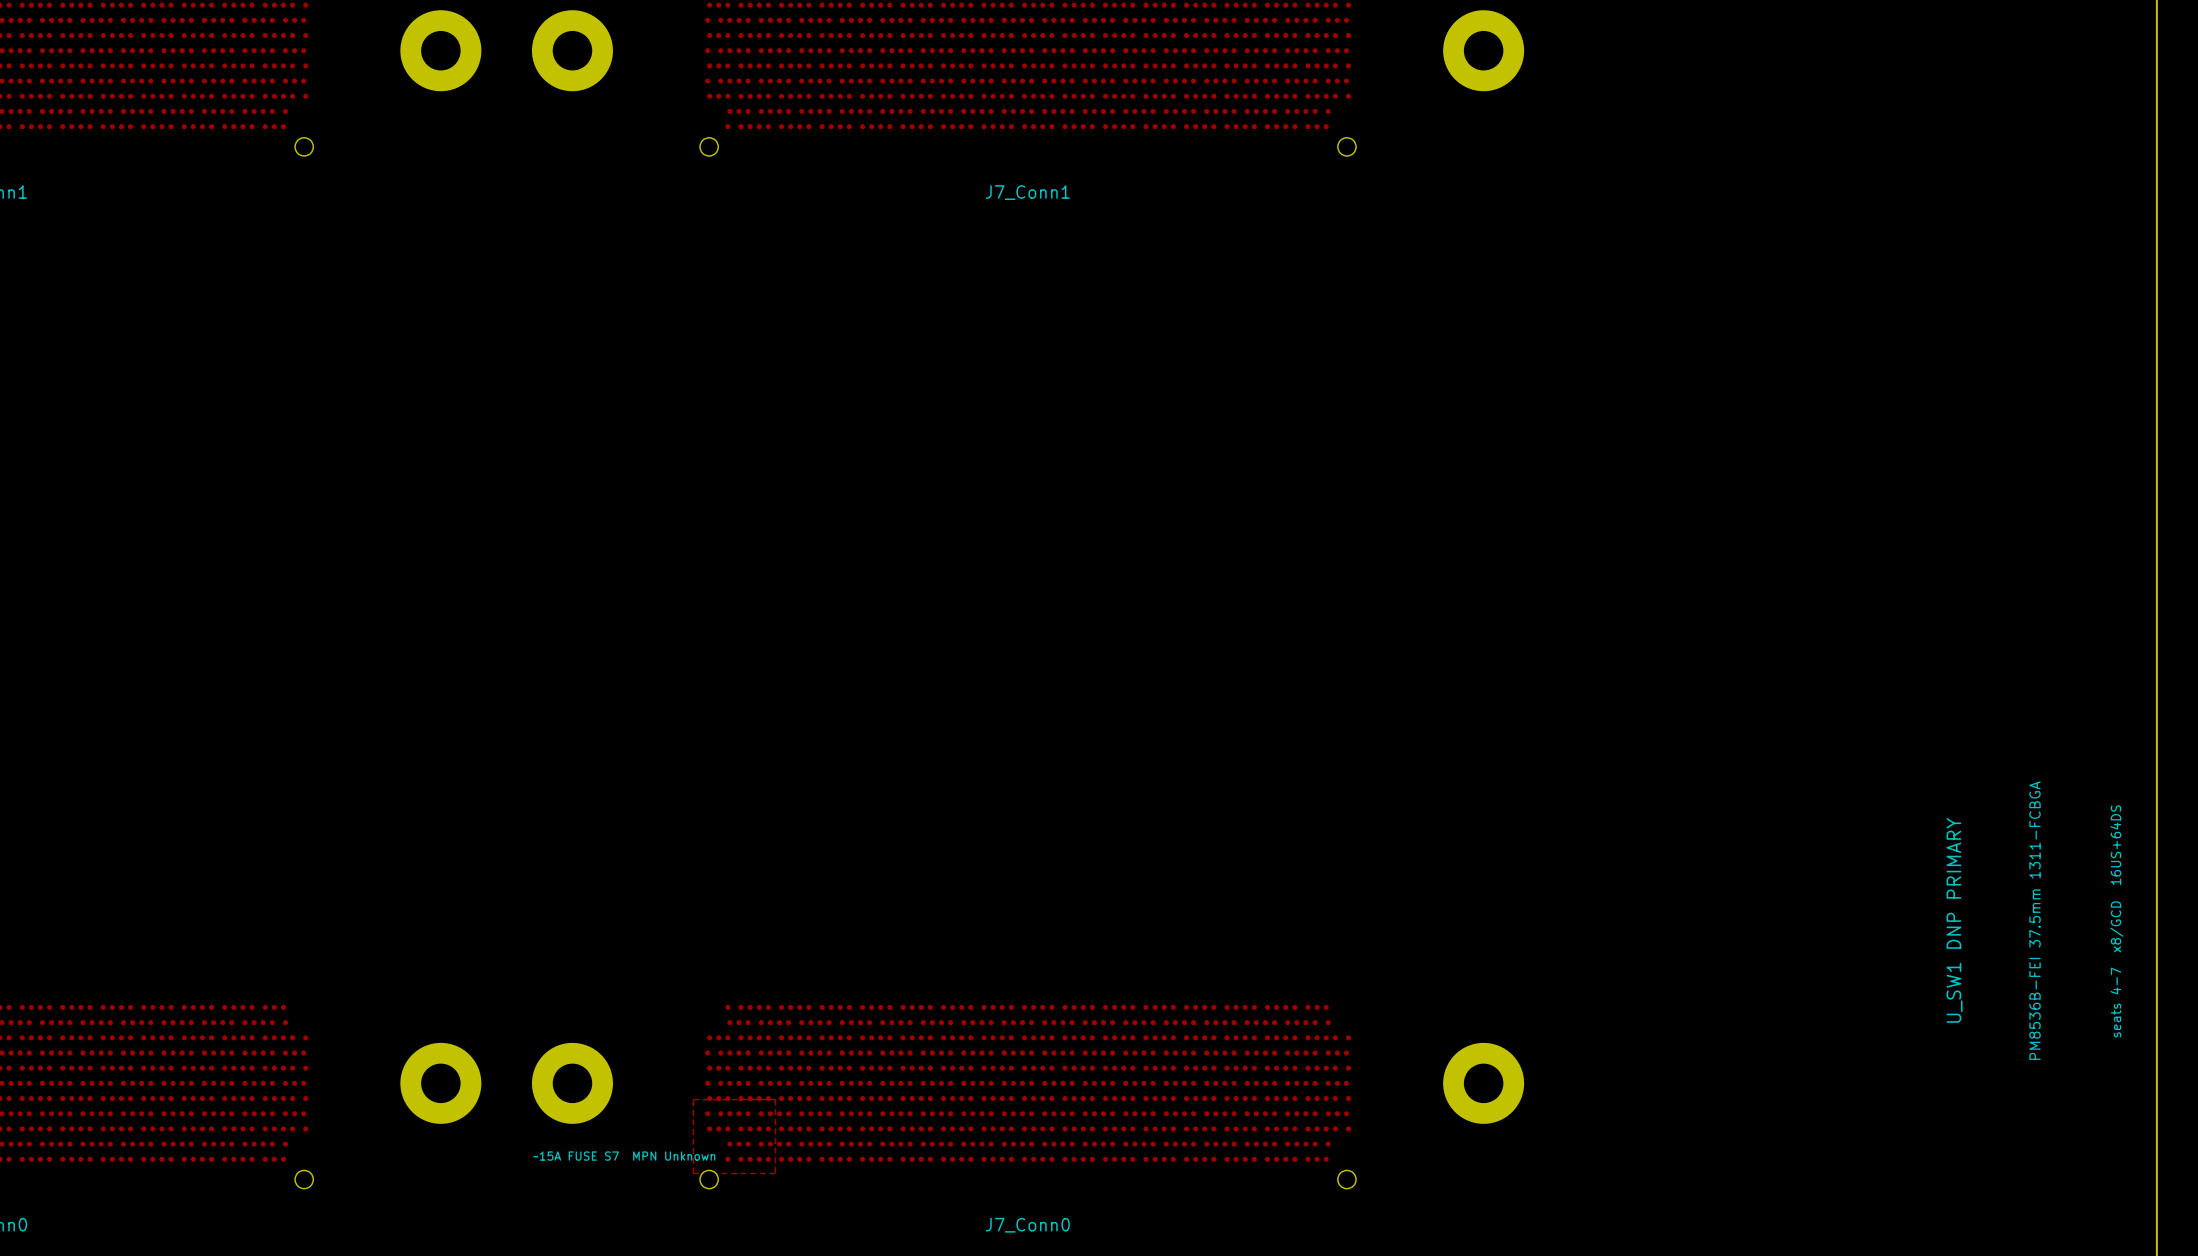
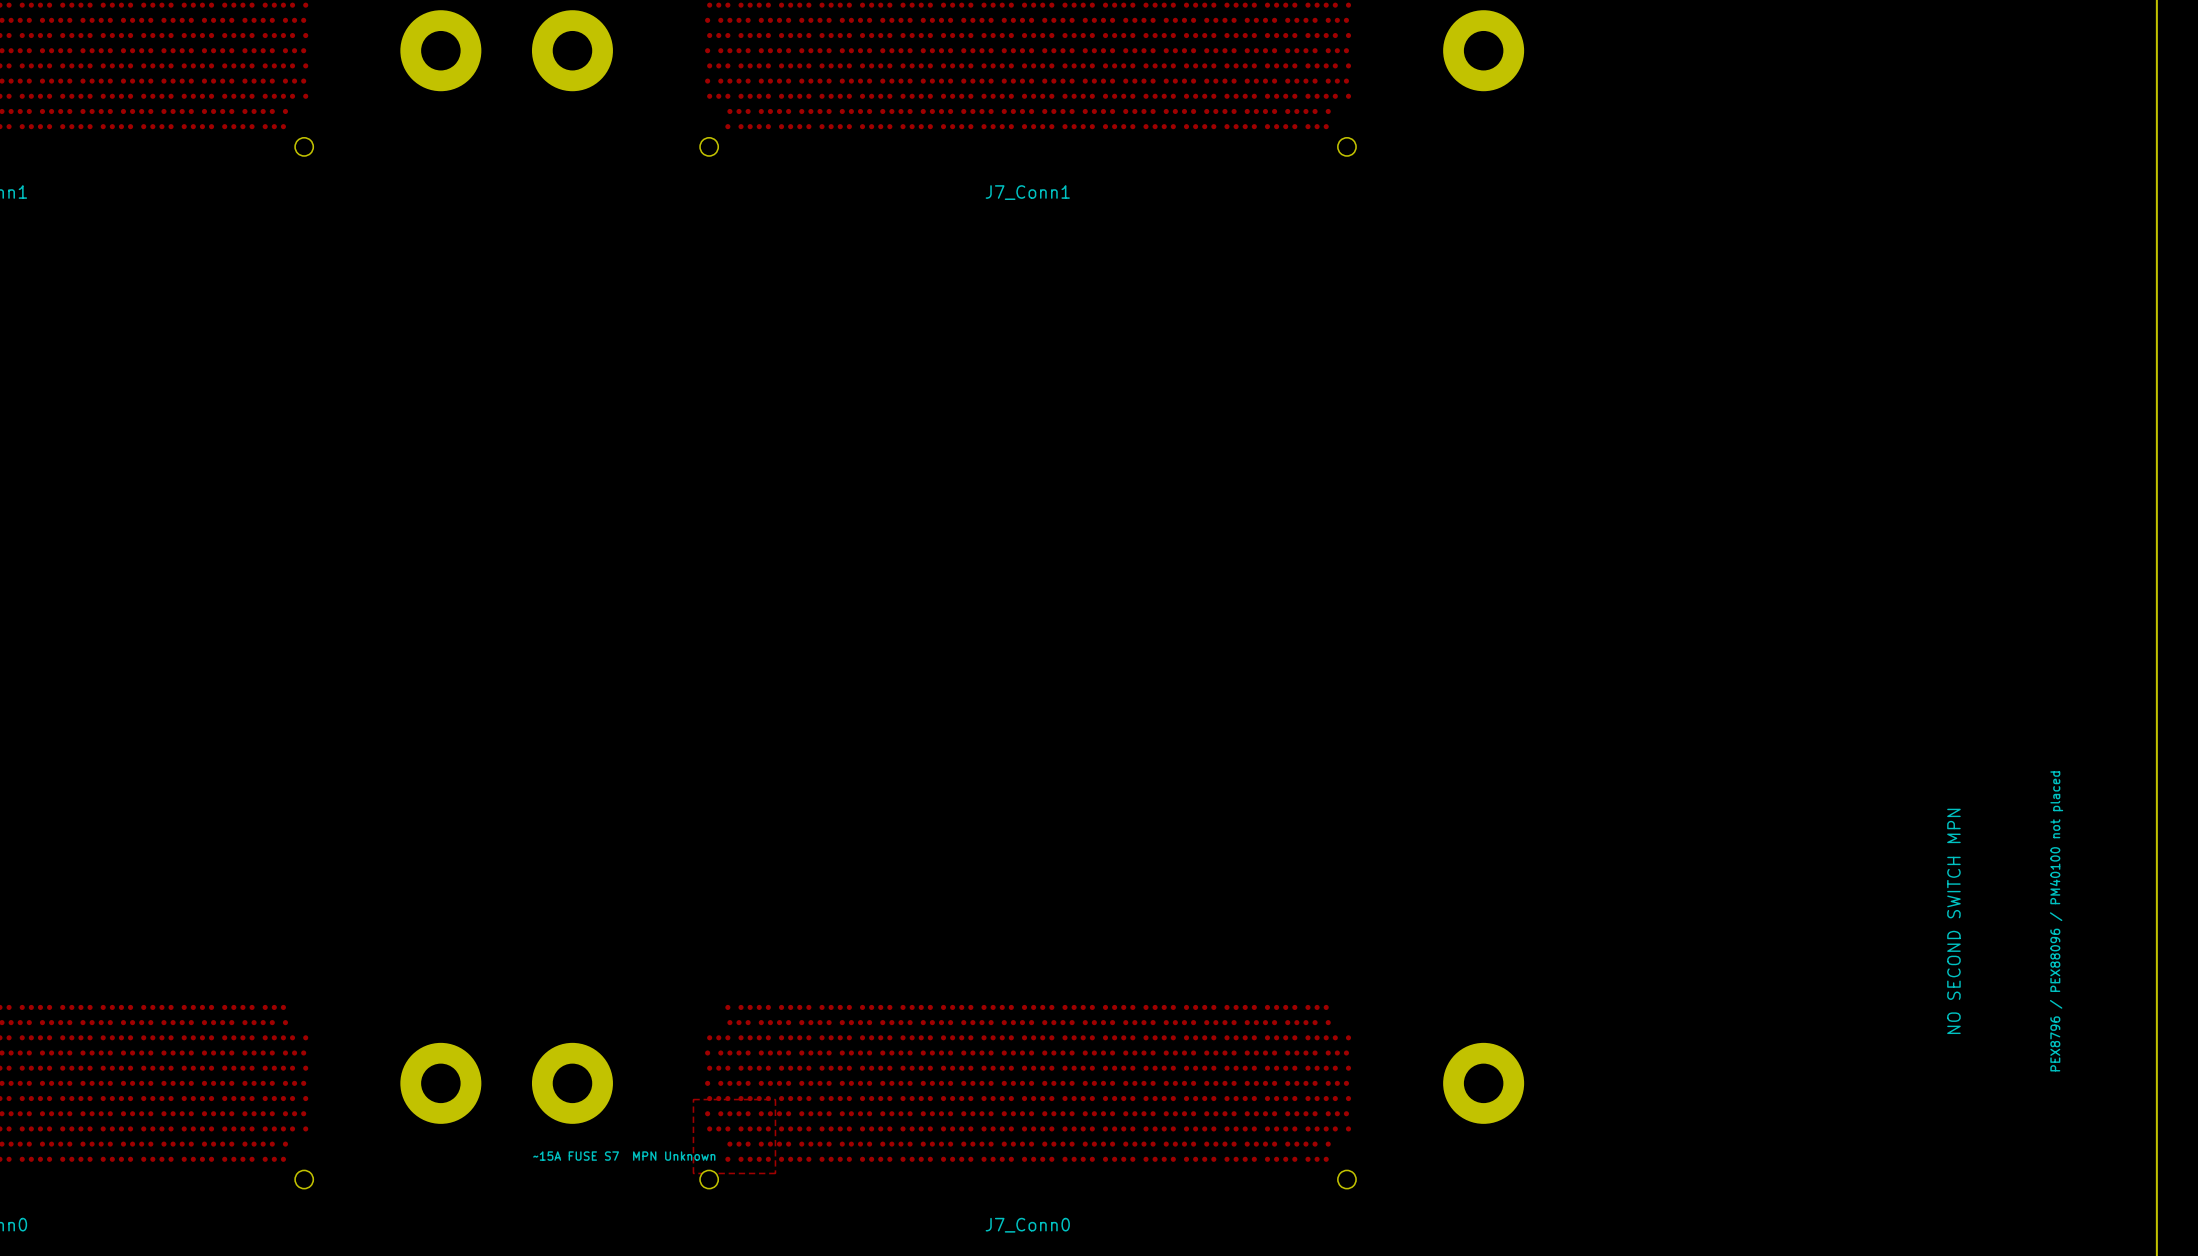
text: U_SW1 DNP PRIMARY (1954, 920) -> NO SECOND SWITCH MPN (1953, 921)
text: PM8536B-FEI 37.5mm 1311-FCBGA (2035, 920) -> none
text: none -> PEX8796 / PEX88096 / PM40100 not placed (2056, 921)
text: seats 4-7 x8/GCD 16US+64DS (2116, 921) -> none

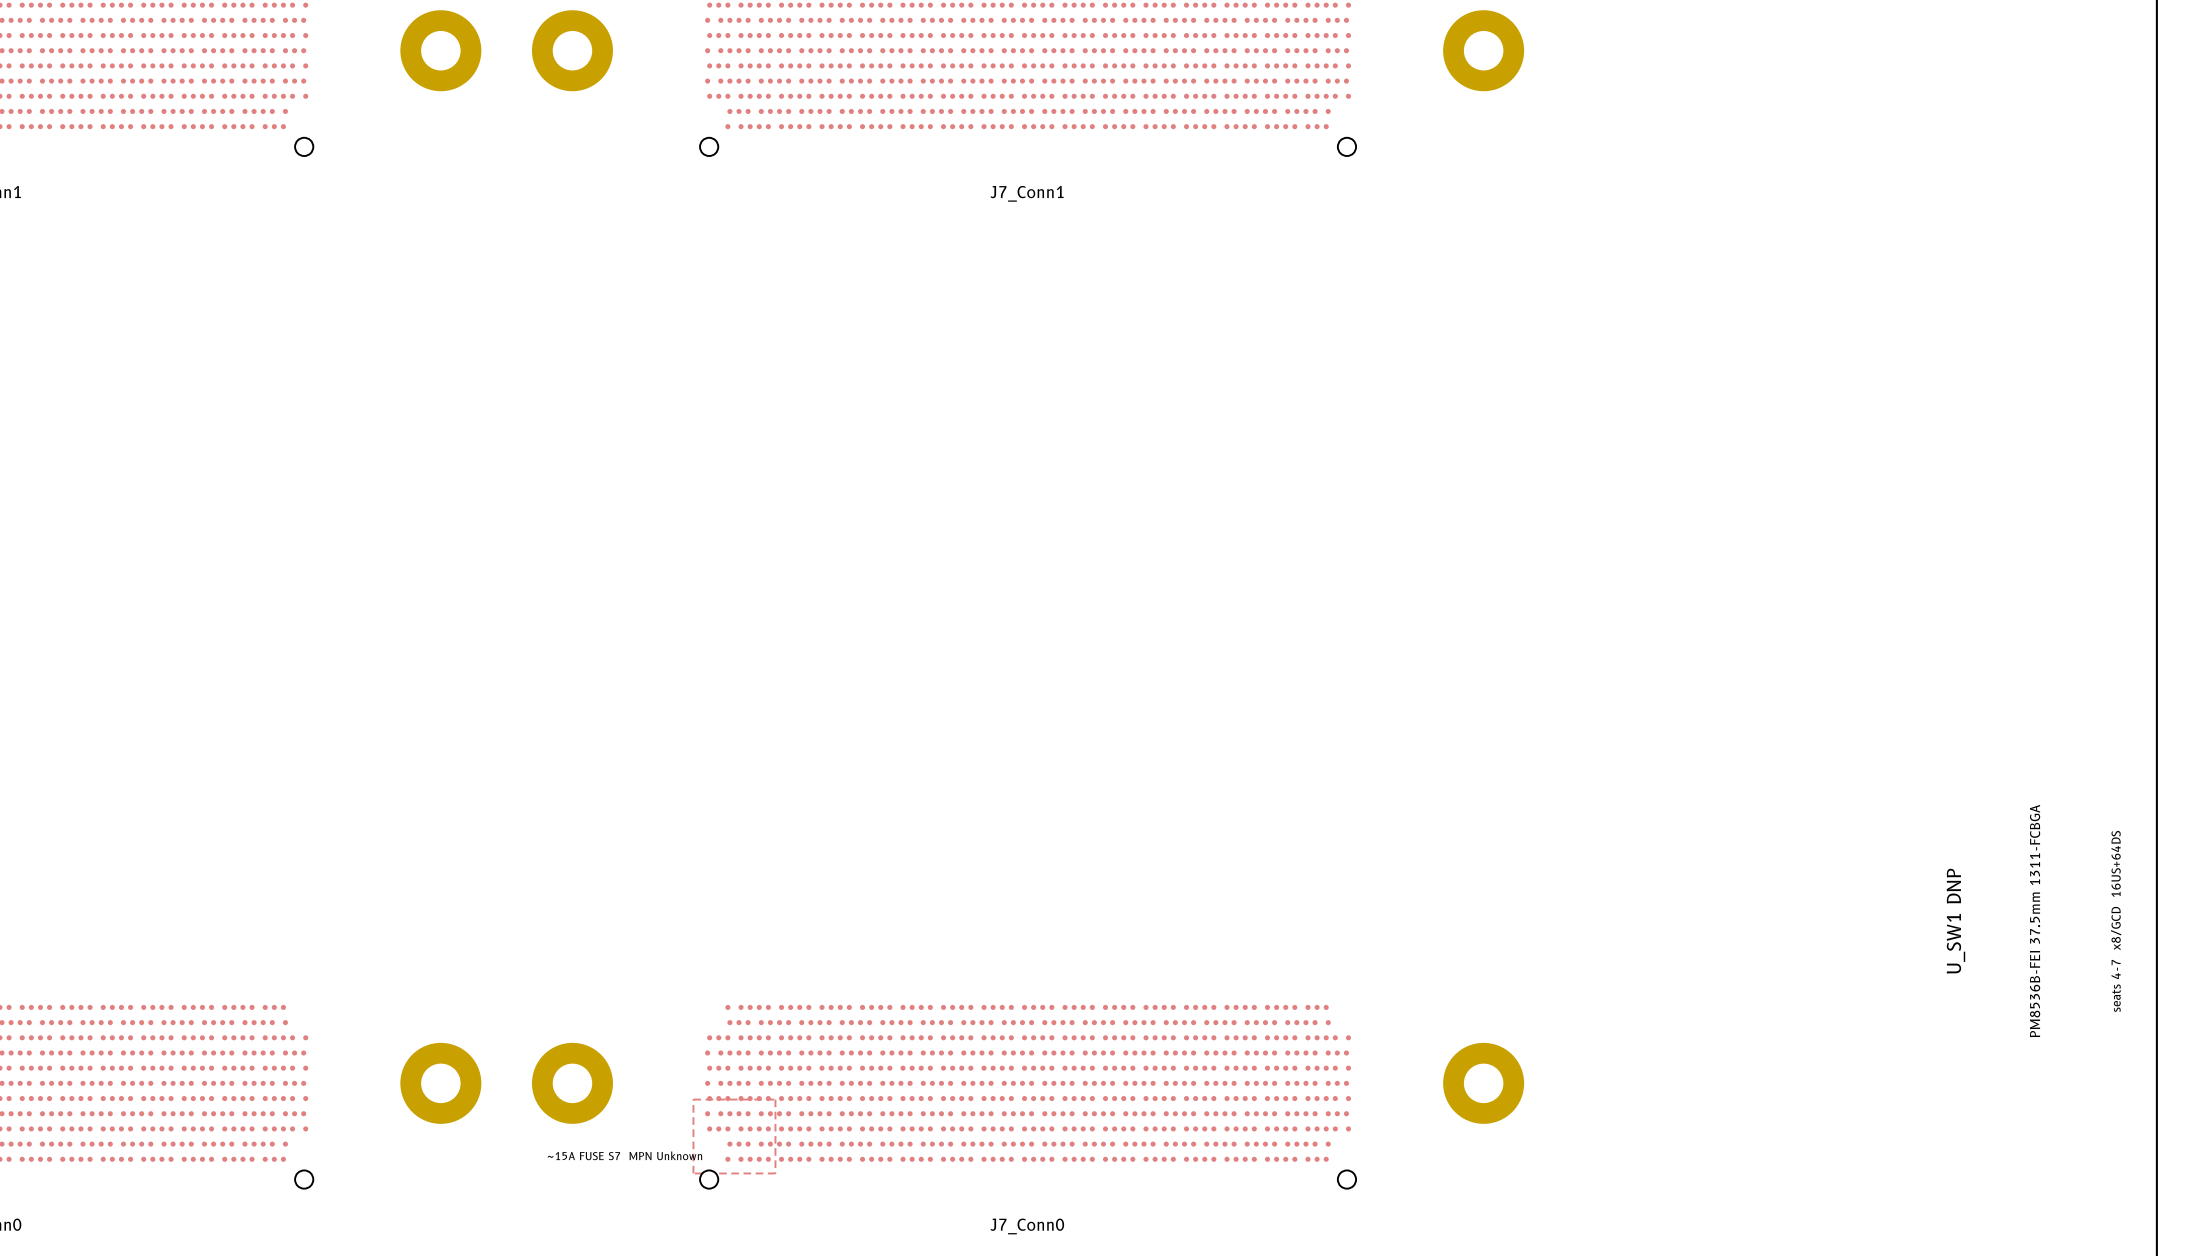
text: none -> PM8536B-FEI 37.5mm 1311-FCBGA (2035, 921)
text: NO SECOND SWITCH MPN (1953, 921) -> U_SW1 DNP (1955, 921)
text: PEX8796 / PEX88096 / PM40100 not placed (2056, 921) -> none
text: none -> seats 4-7 x8/GCD 16US+64DS (2116, 921)

